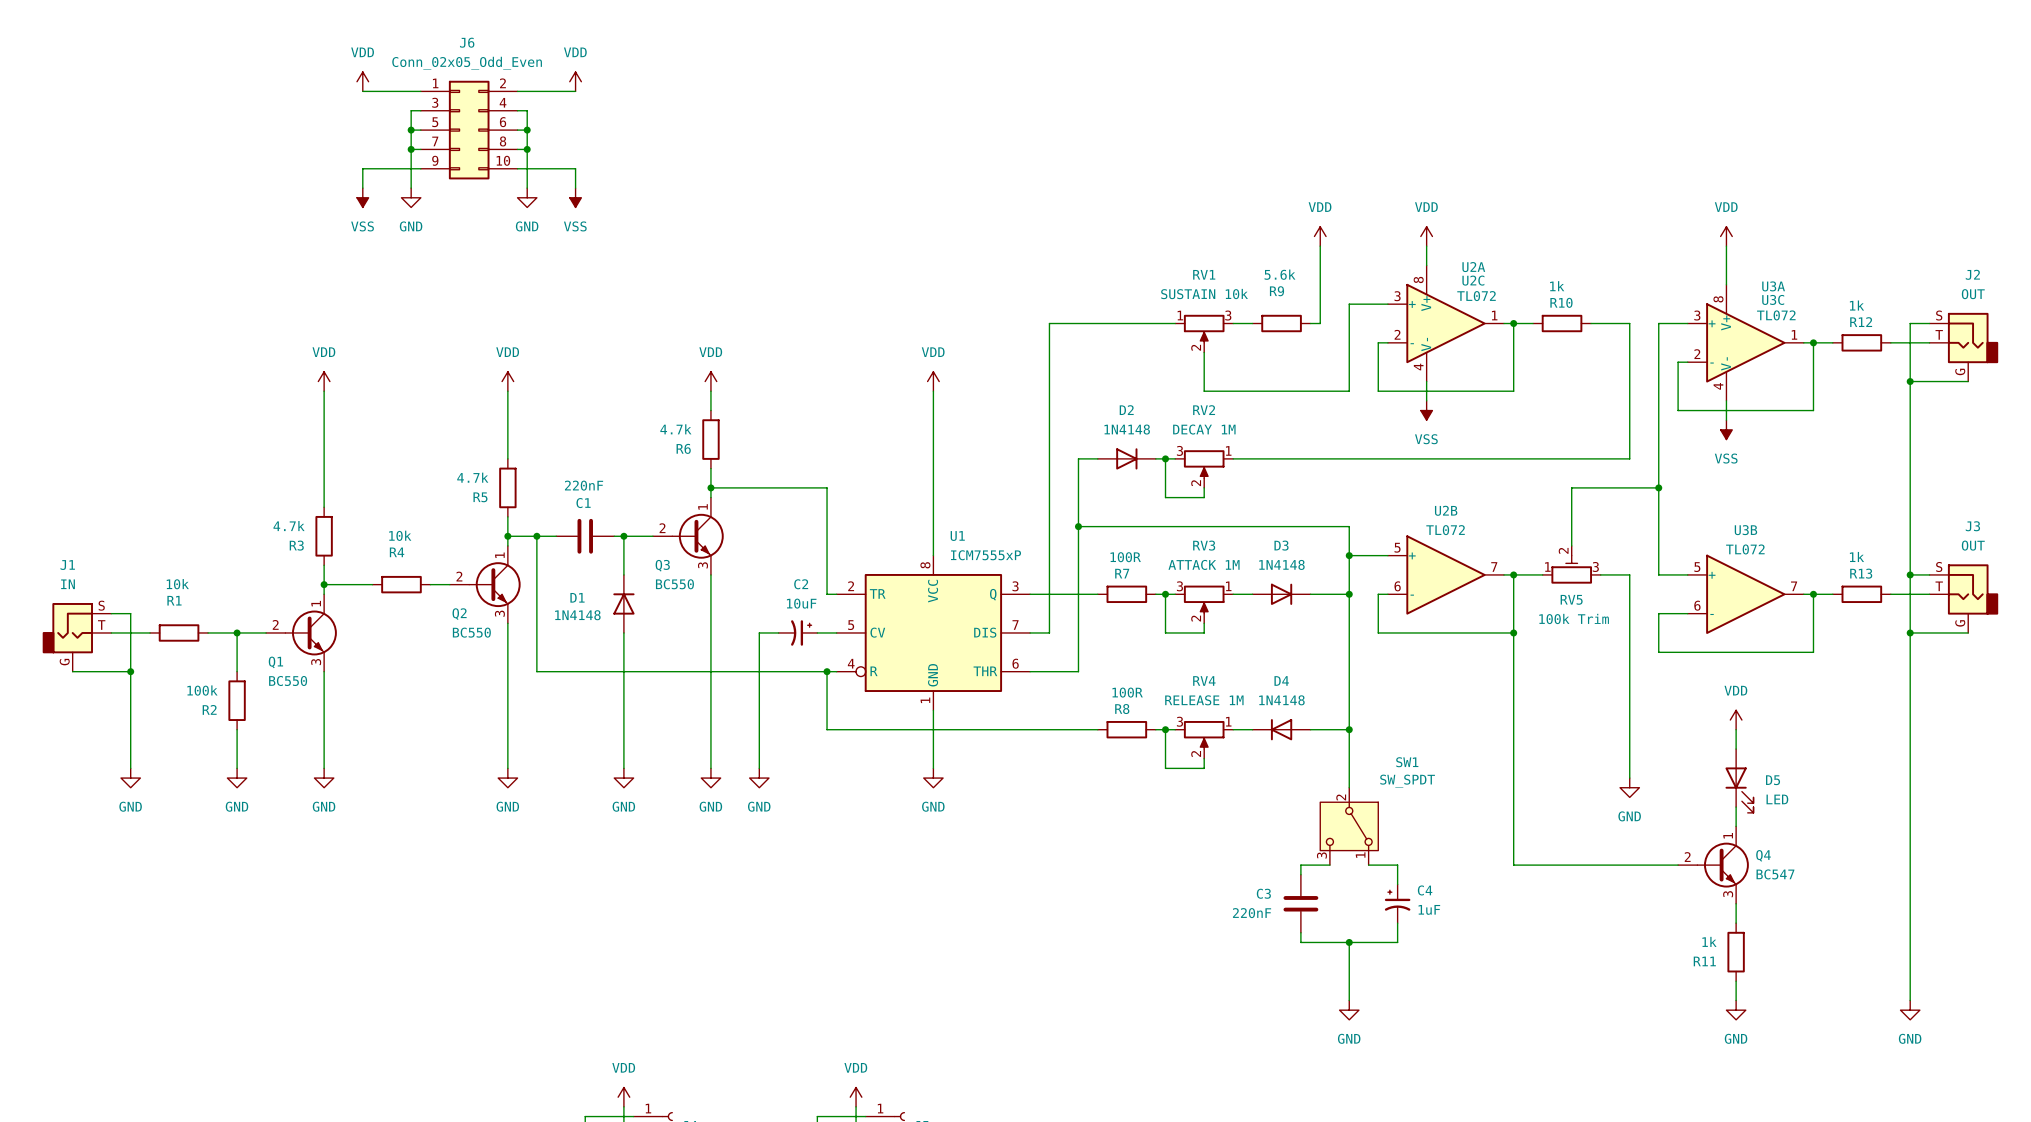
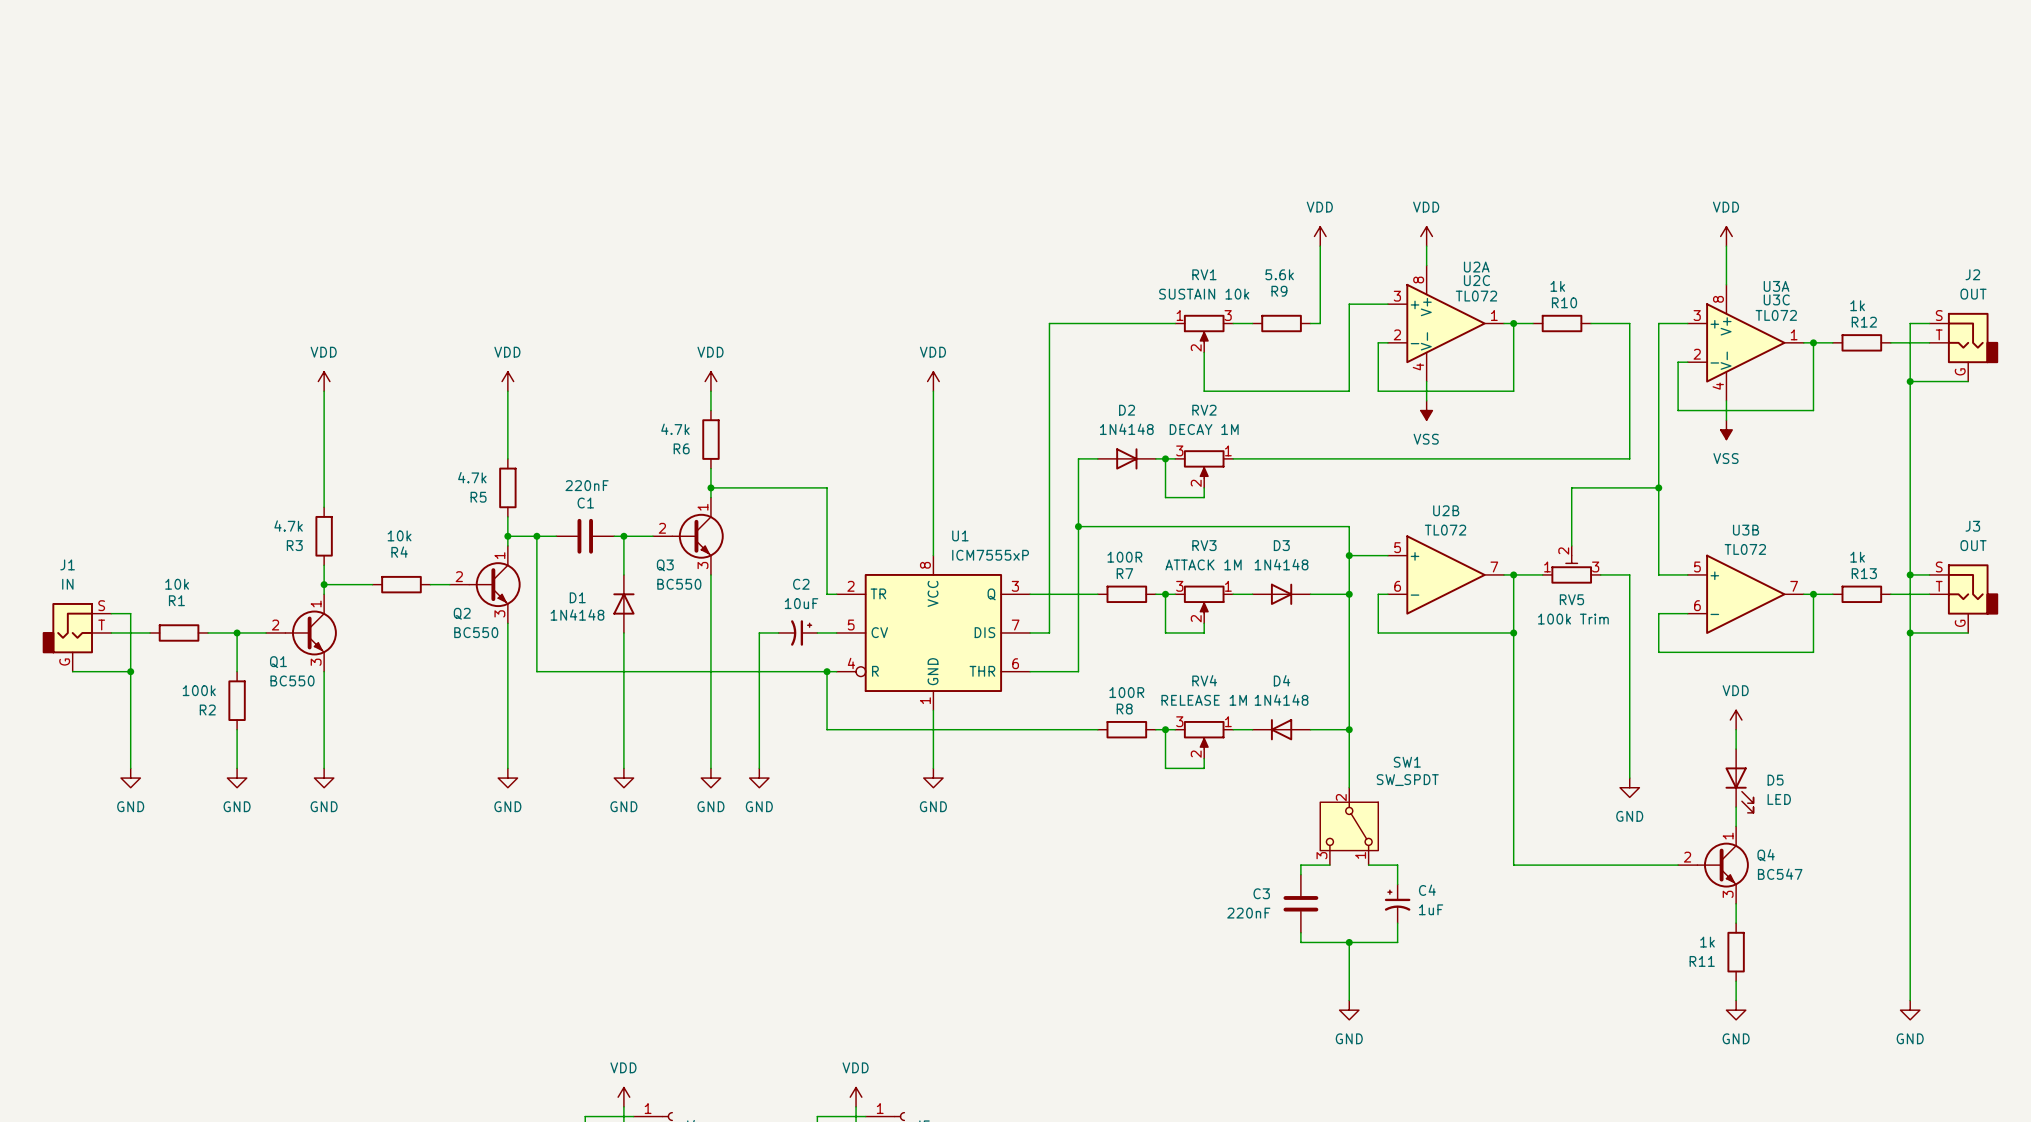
power symbol: VDD (362, 81) -> none
power symbol: VDD (575, 81) -> none
wire: (362, 91) (420, 91) -> none
wire: (517, 91) (575, 91) -> none
wire: (420, 110) (411, 110) (411, 188) -> none
wire: (517, 110) (527, 110) (527, 188) -> none
wire: (411, 130) (420, 130) -> none
junction: (411, 130) -> none
J6: Conn_02x05_Odd_Even (469, 130) -> none
wire: (517, 130) (527, 130) -> none
junction: (527, 130) -> none
wire: (411, 149) (420, 149) -> none
junction: (411, 149) -> none
wire: (517, 149) (527, 149) -> none
junction: (527, 149) -> none
wire: (420, 168) (362, 168) (362, 188) -> none
wire: (517, 168) (575, 168) (575, 188) -> none
power symbol: VSS (362, 197) -> none
power symbol: GND (411, 197) -> none
power symbol: GND (527, 197) -> none
power symbol: VSS (575, 197) -> none

